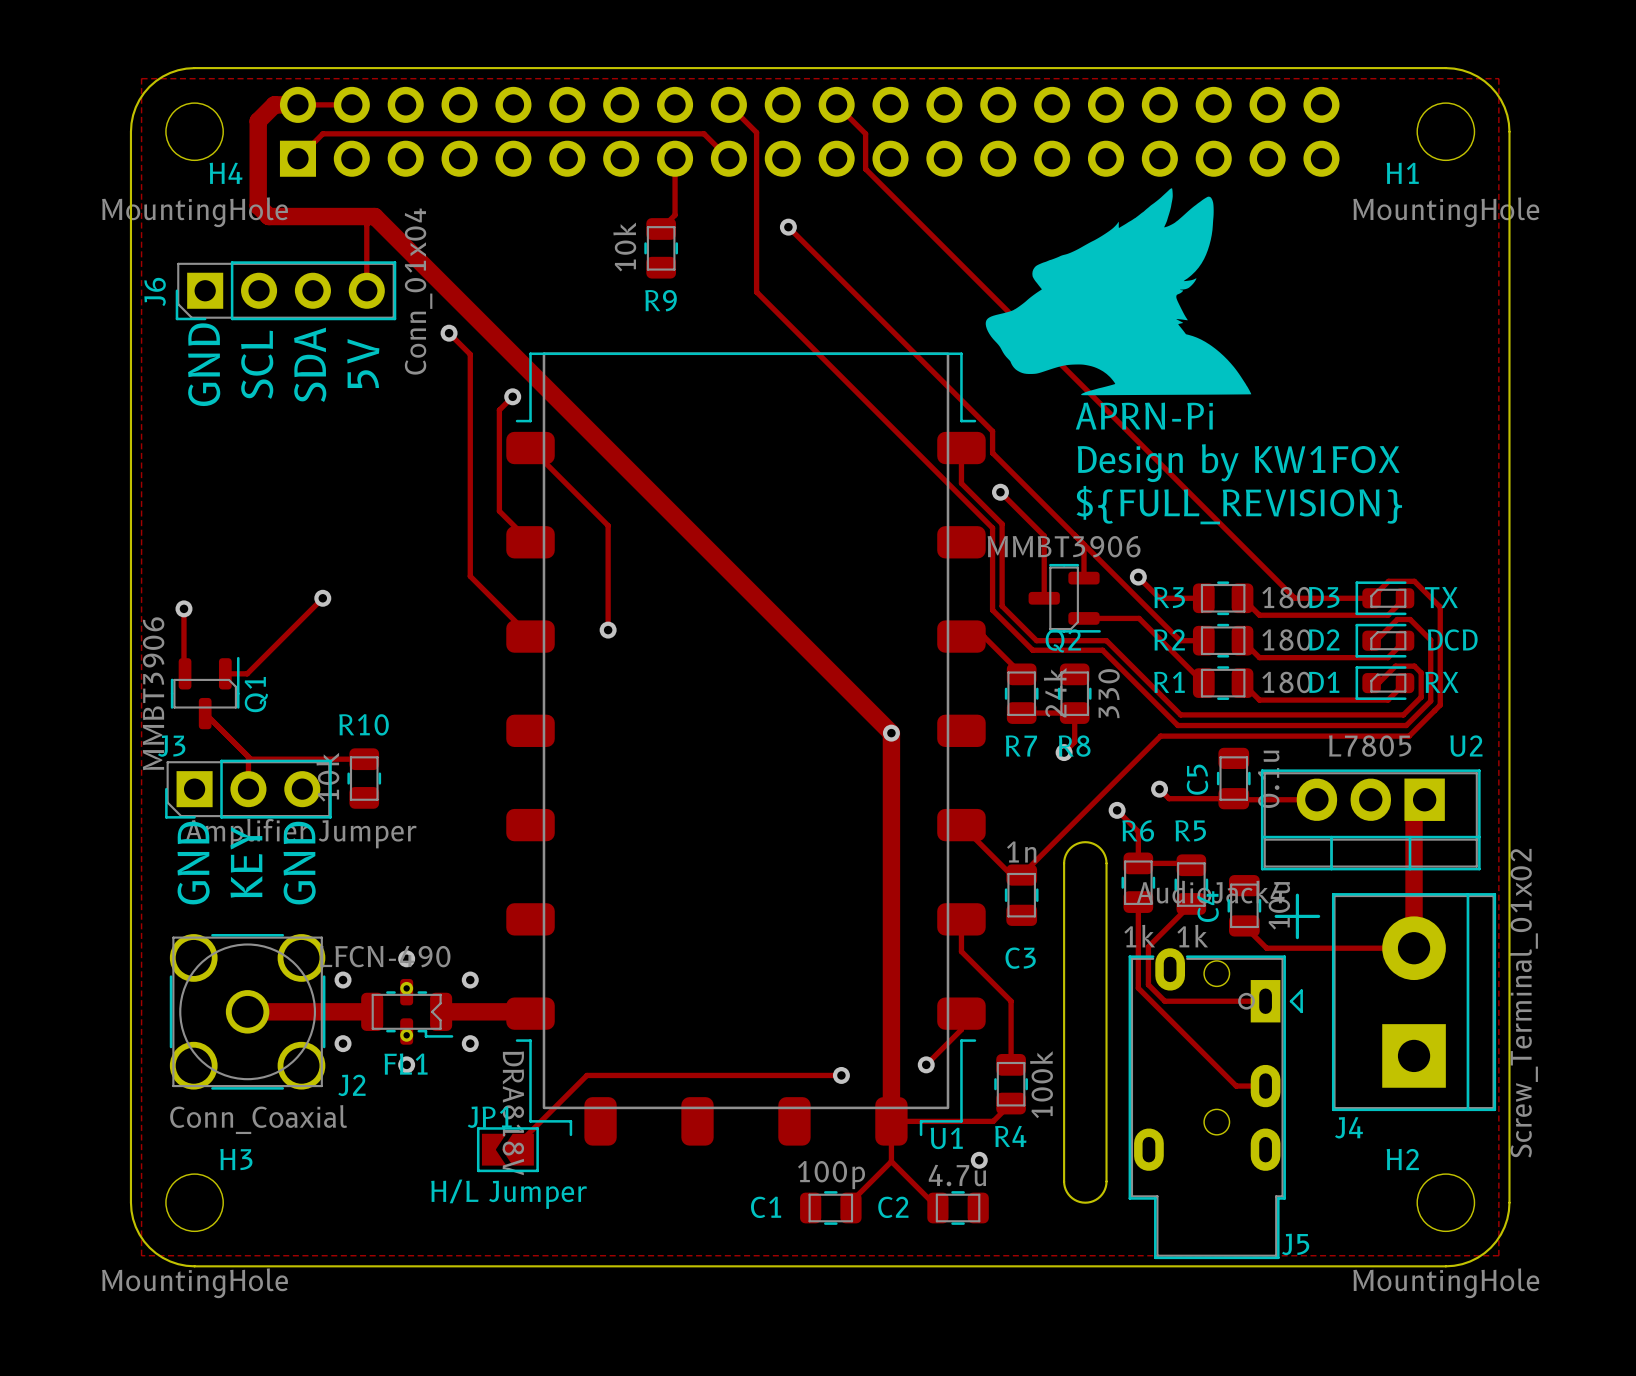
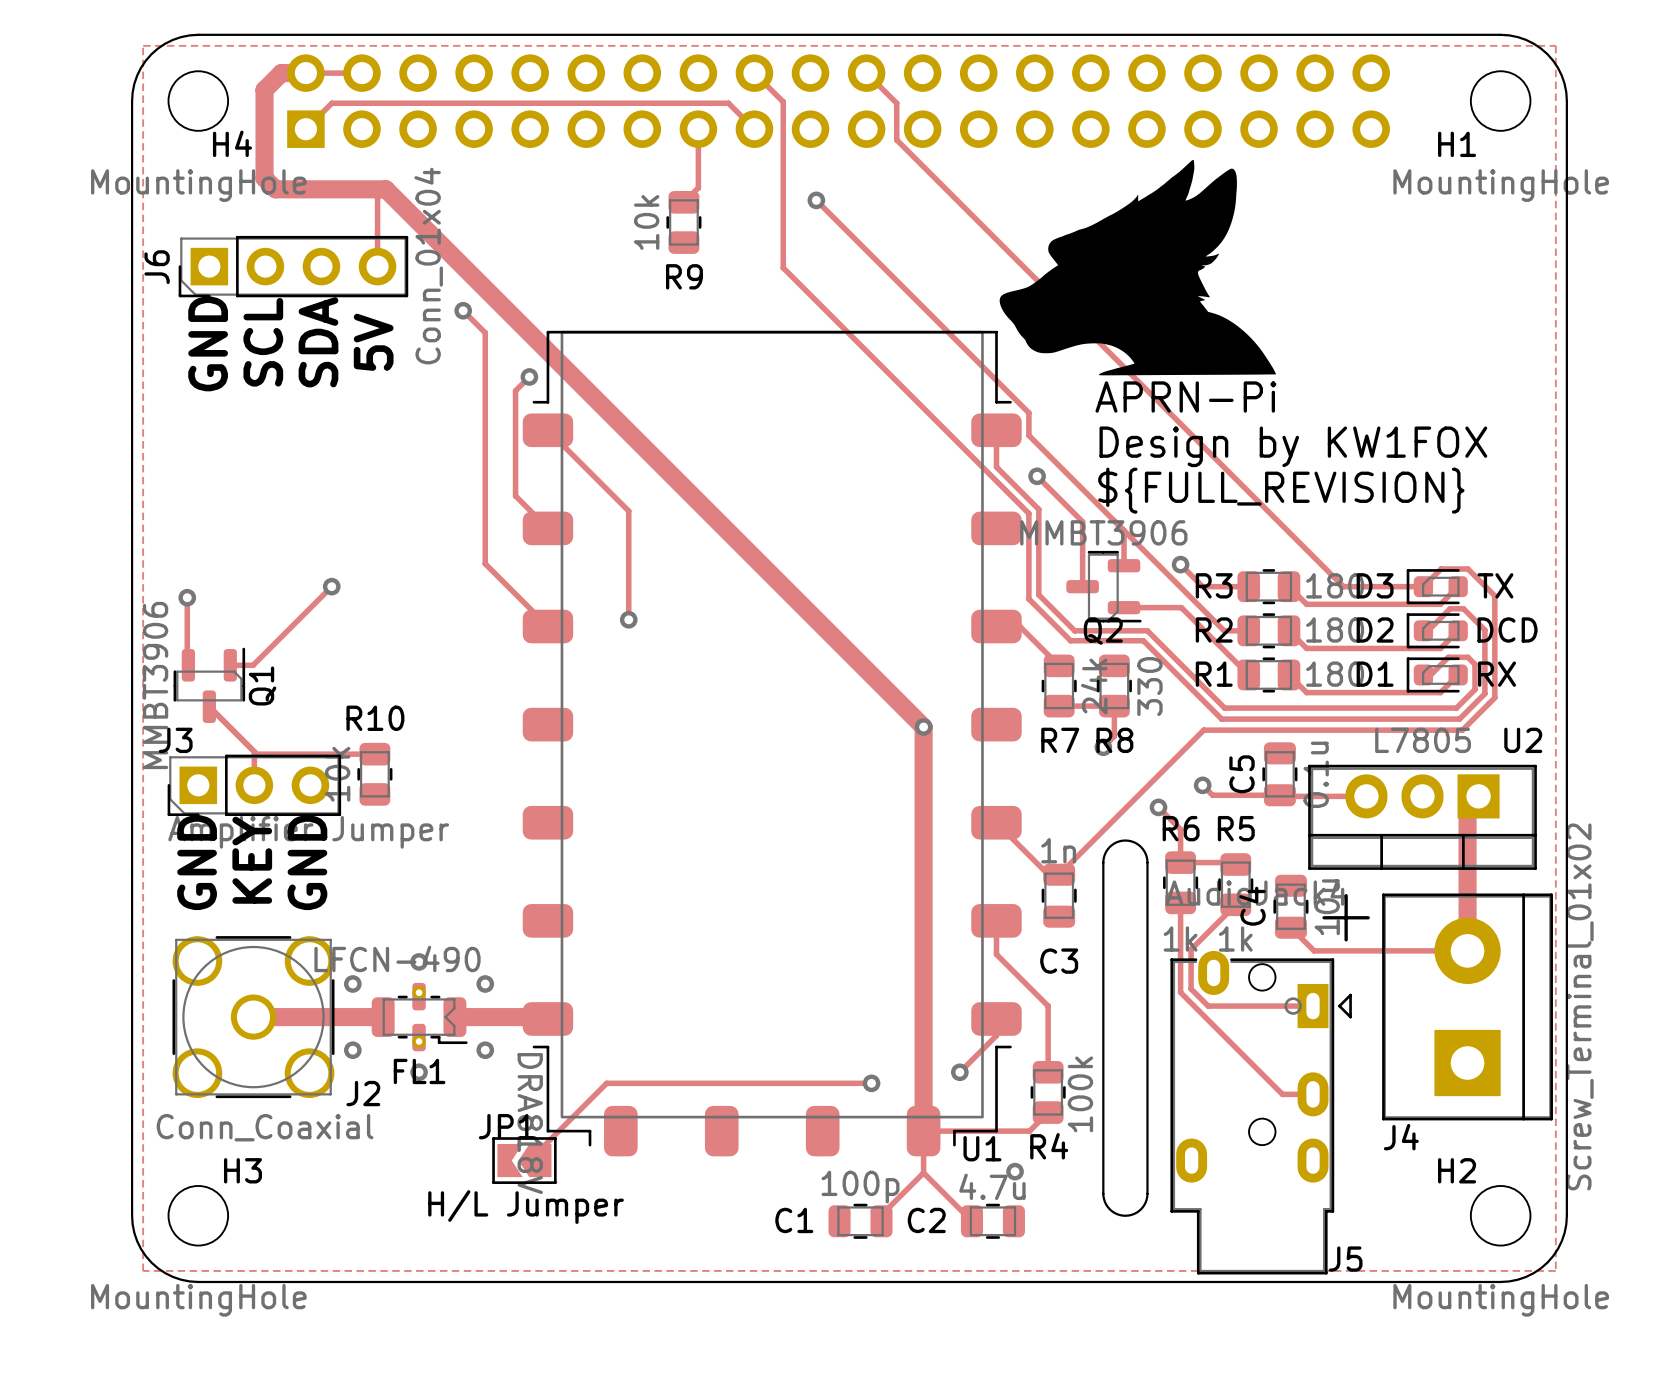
part position: (1118, 291) -> (1137, 267)
text position: APRN-Pi (1144, 416) -> APRN-Pi (1185, 397)
text position: Design by KW1FOX (1238, 463) -> Design by KW1FOX (1293, 446)
text position: ${FULL_REVISION} (1239, 505) -> ${FULL_REVISION} (1281, 490)

